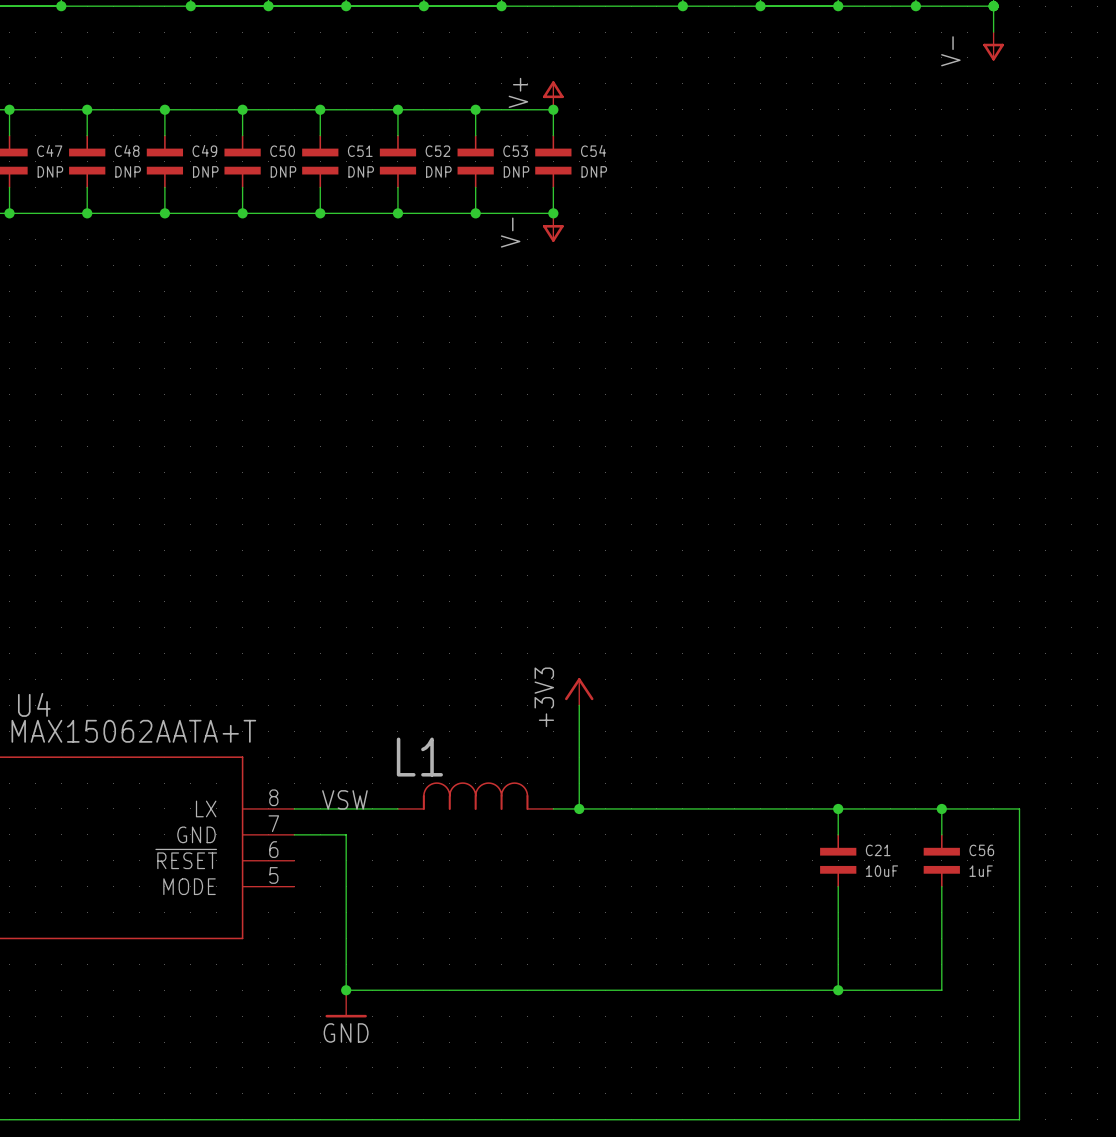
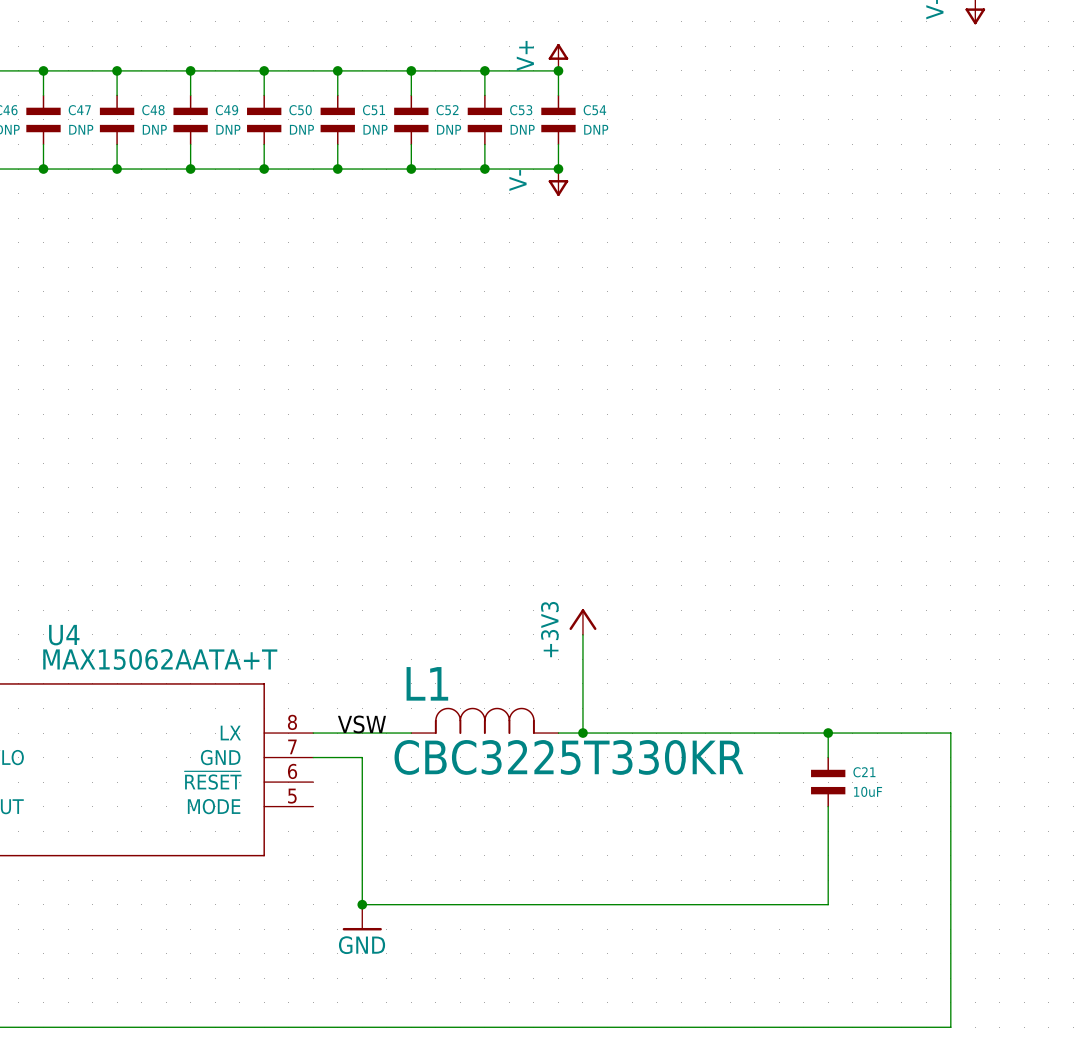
wire: (941, 808) (941, 834) -> none
junction: (941, 808) -> none
wire: (967, 808) (1019, 808) (1019, 1119) (967, 1119) -> (950, 733) (950, 1027)
L1 value: none -> CBC3225T330KR (568, 757)
C56: 1uF (941, 860) -> none
wire: (941, 886) (941, 990) (838, 990) -> none
junction: (838, 990) -> none

